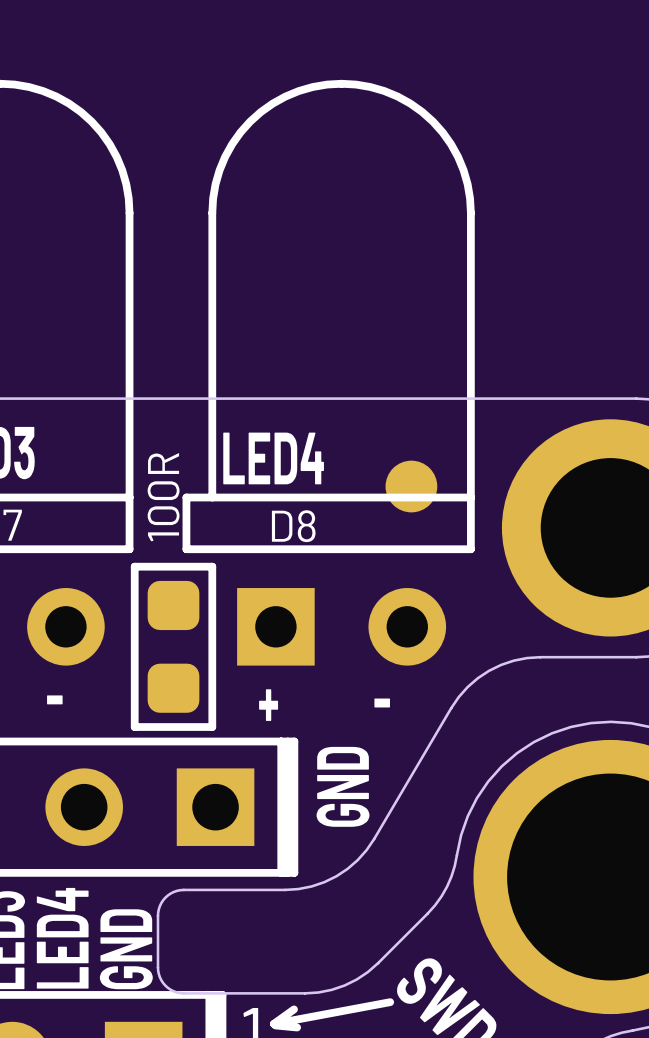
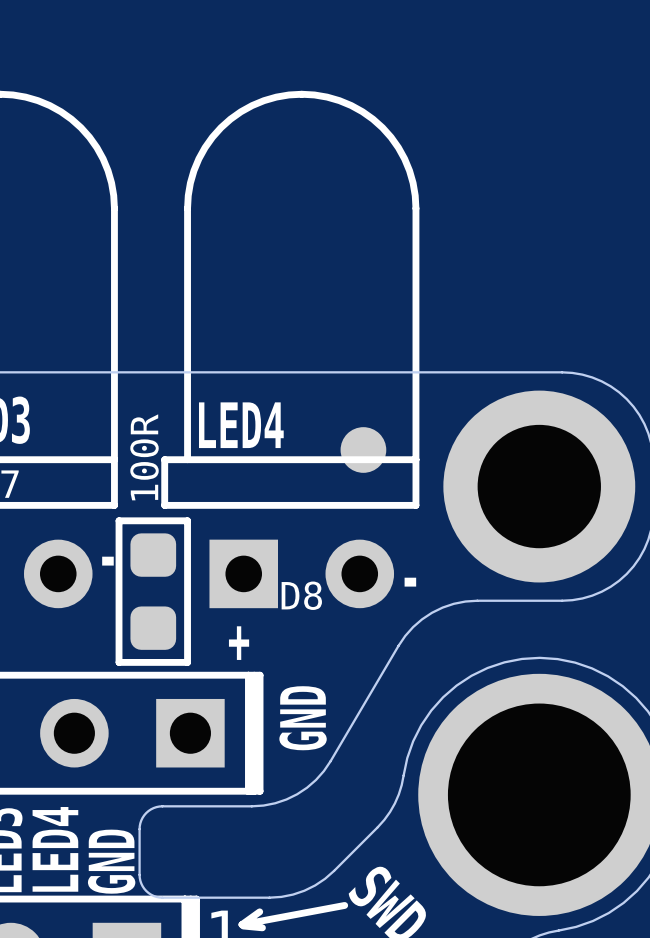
D8 name position: D8 (293, 526) -> D8 (301, 595)
text position: - (54, 699) -> - (107, 561)
text position: - (382, 702) -> - (410, 582)

